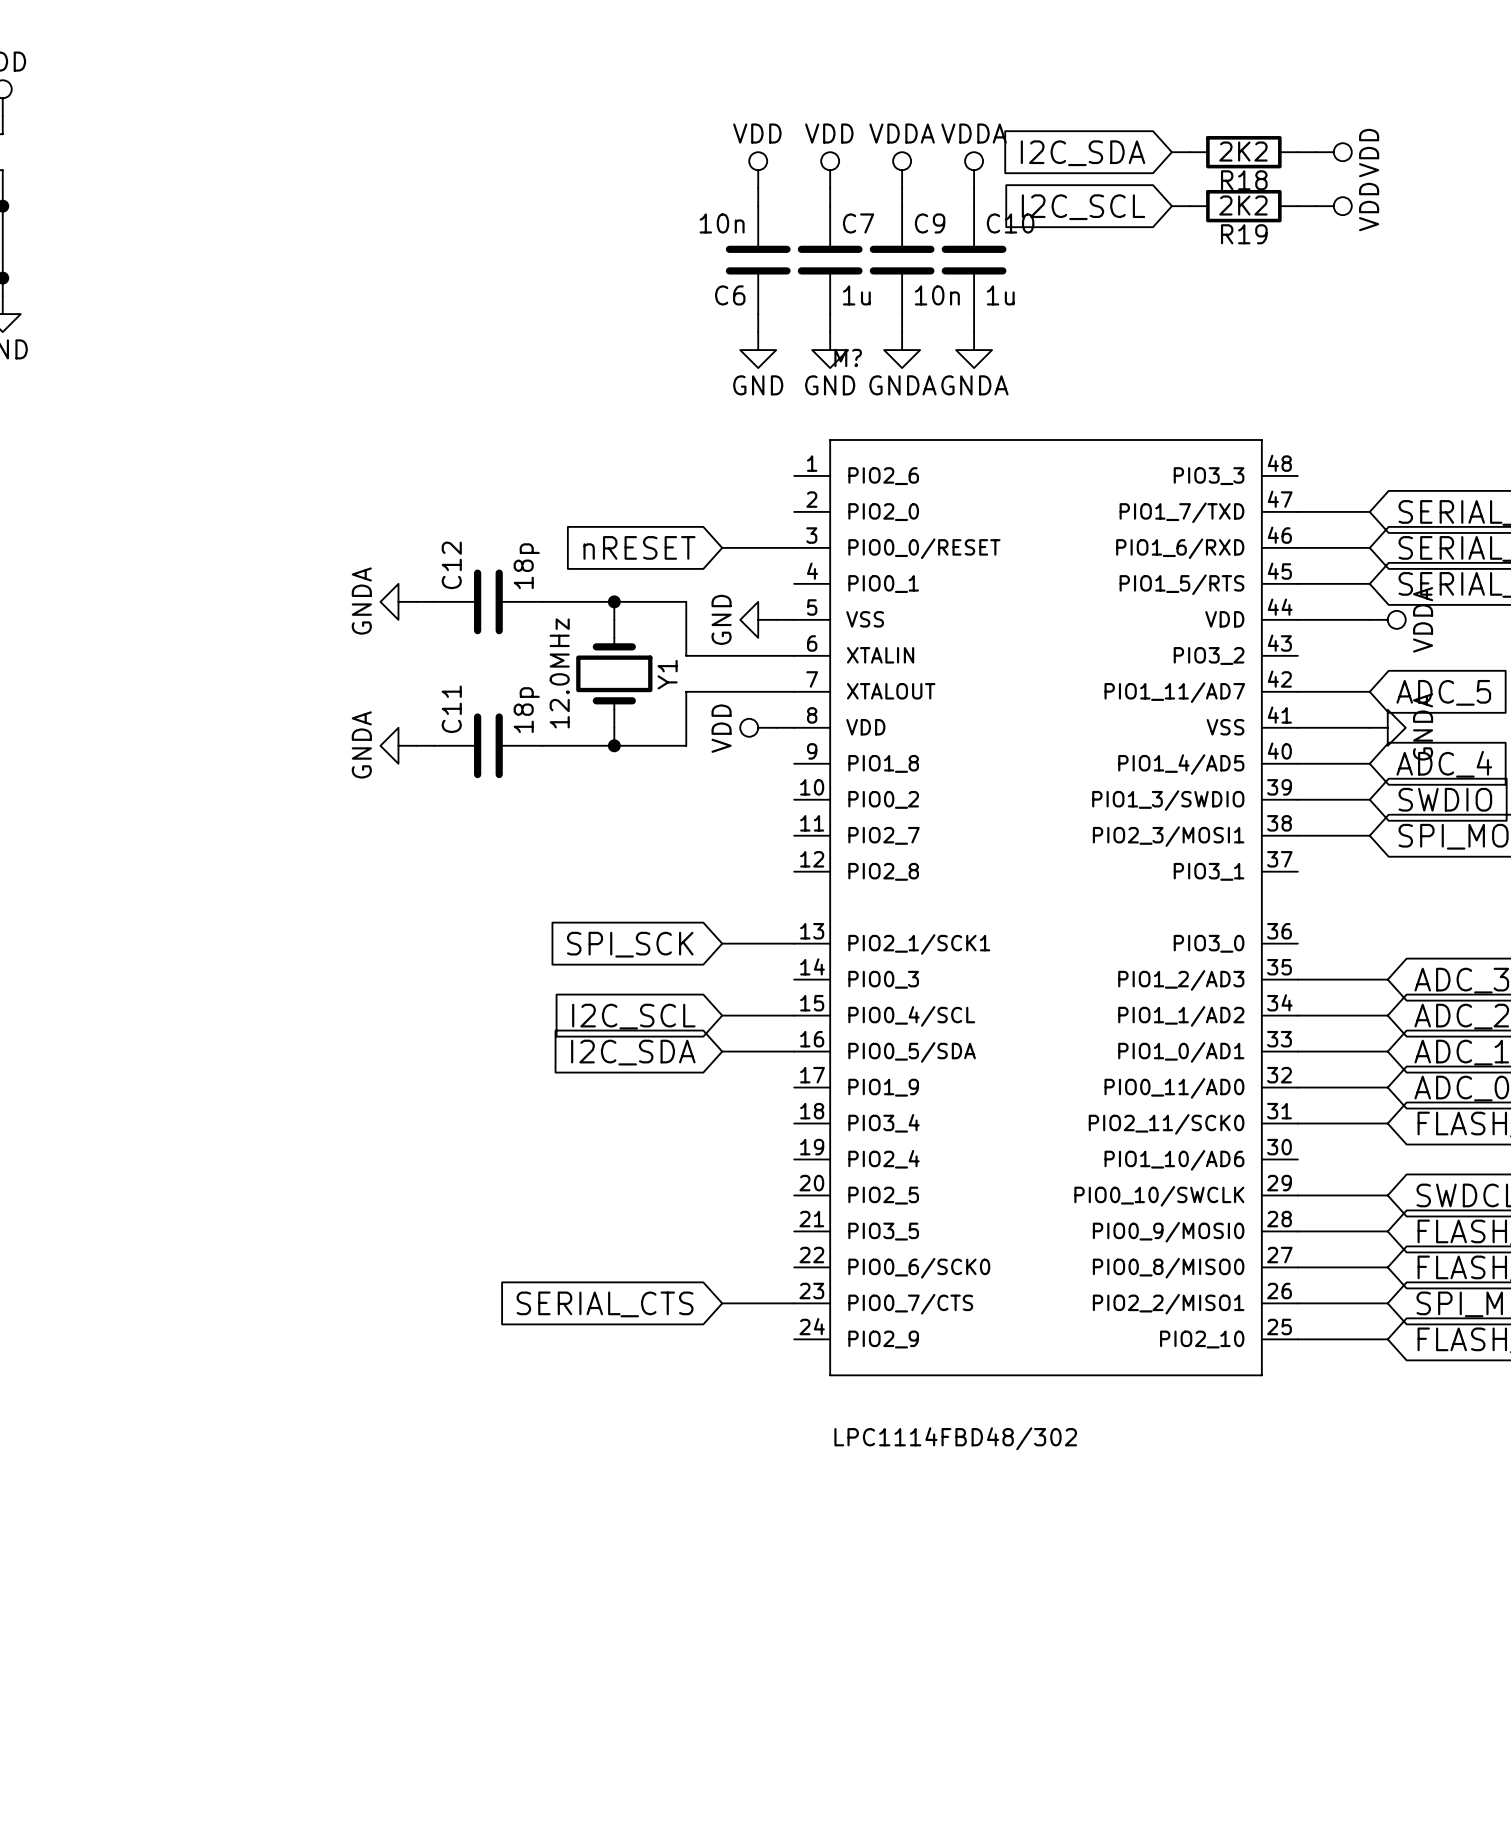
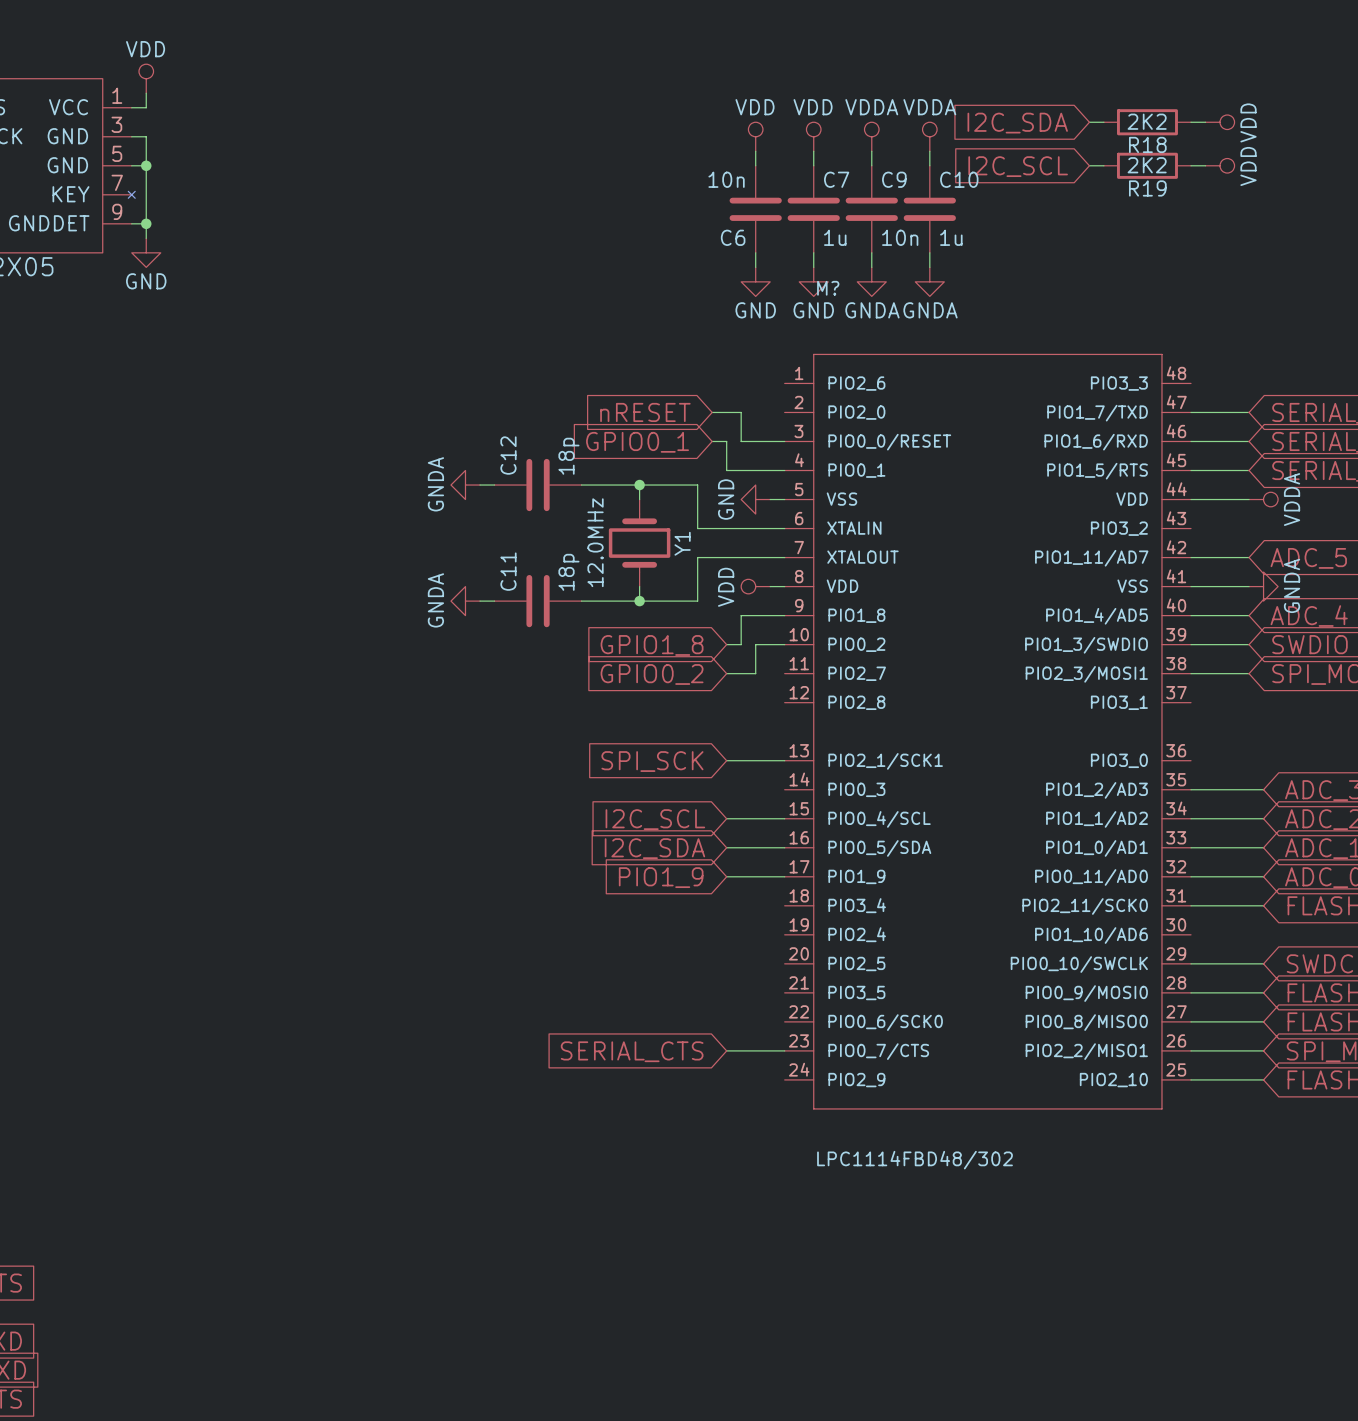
global label position: nRESET (639, 547) -> nRESET (645, 412)
wire: none -> (712, 441) (726, 441) (726, 470) (784, 470)
wire: (722, 547) (740, 547) -> (712, 412) (741, 412) (741, 441)
global label: none -> GPIO0_1 (637, 442)
wire: none -> (784, 615) (741, 615) (741, 644) (726, 644)
wire: none -> (784, 644) (755, 644) (755, 673) (726, 673)
global label: none -> GPIO1_8 (652, 645)
global label: none -> GPIO0_2 (652, 674)
wire: none -> (726, 876) (784, 876)
global label: none -> PIO1_9 (661, 877)

